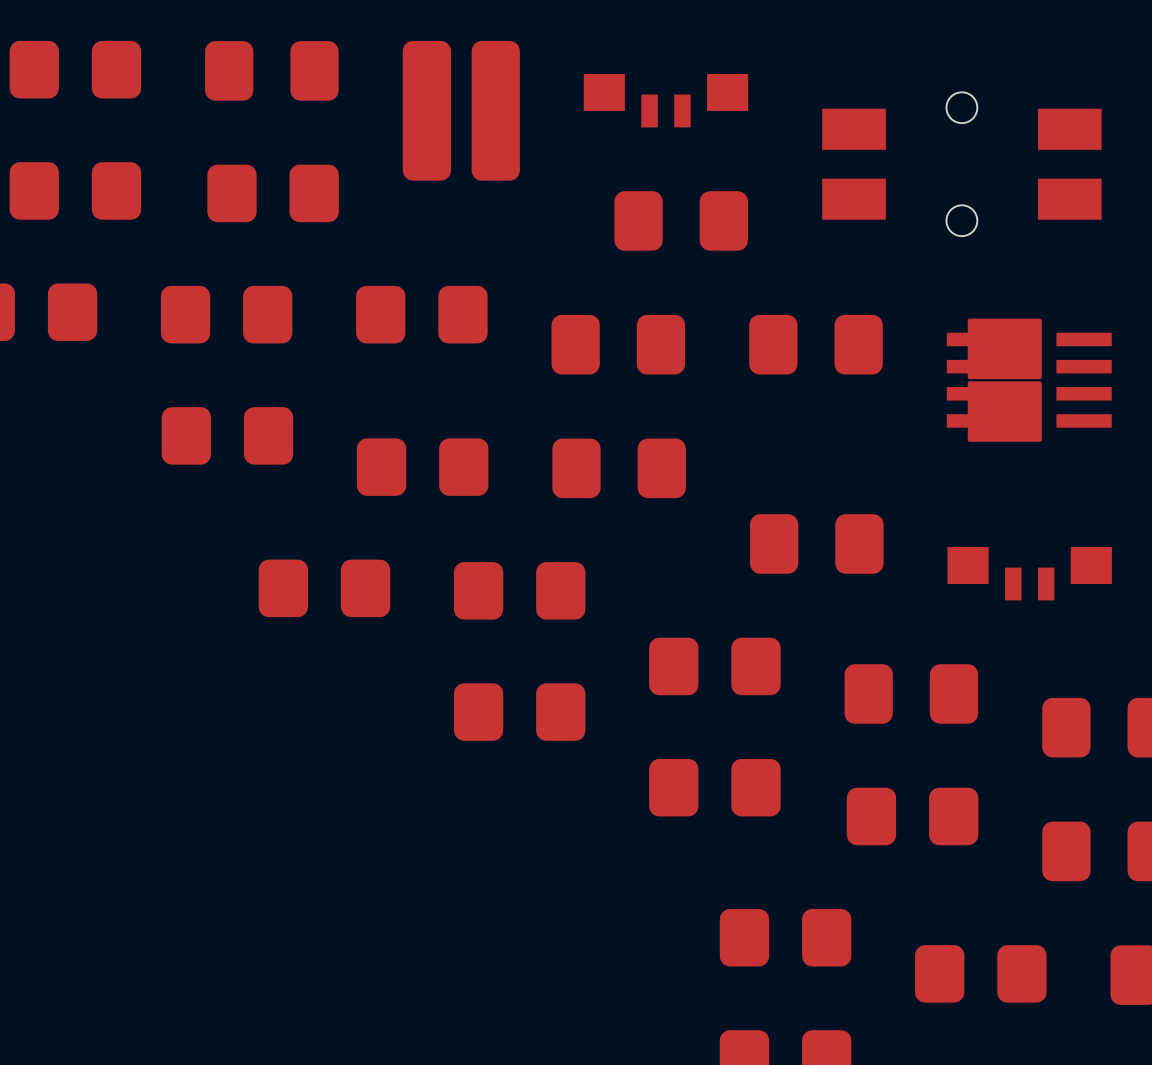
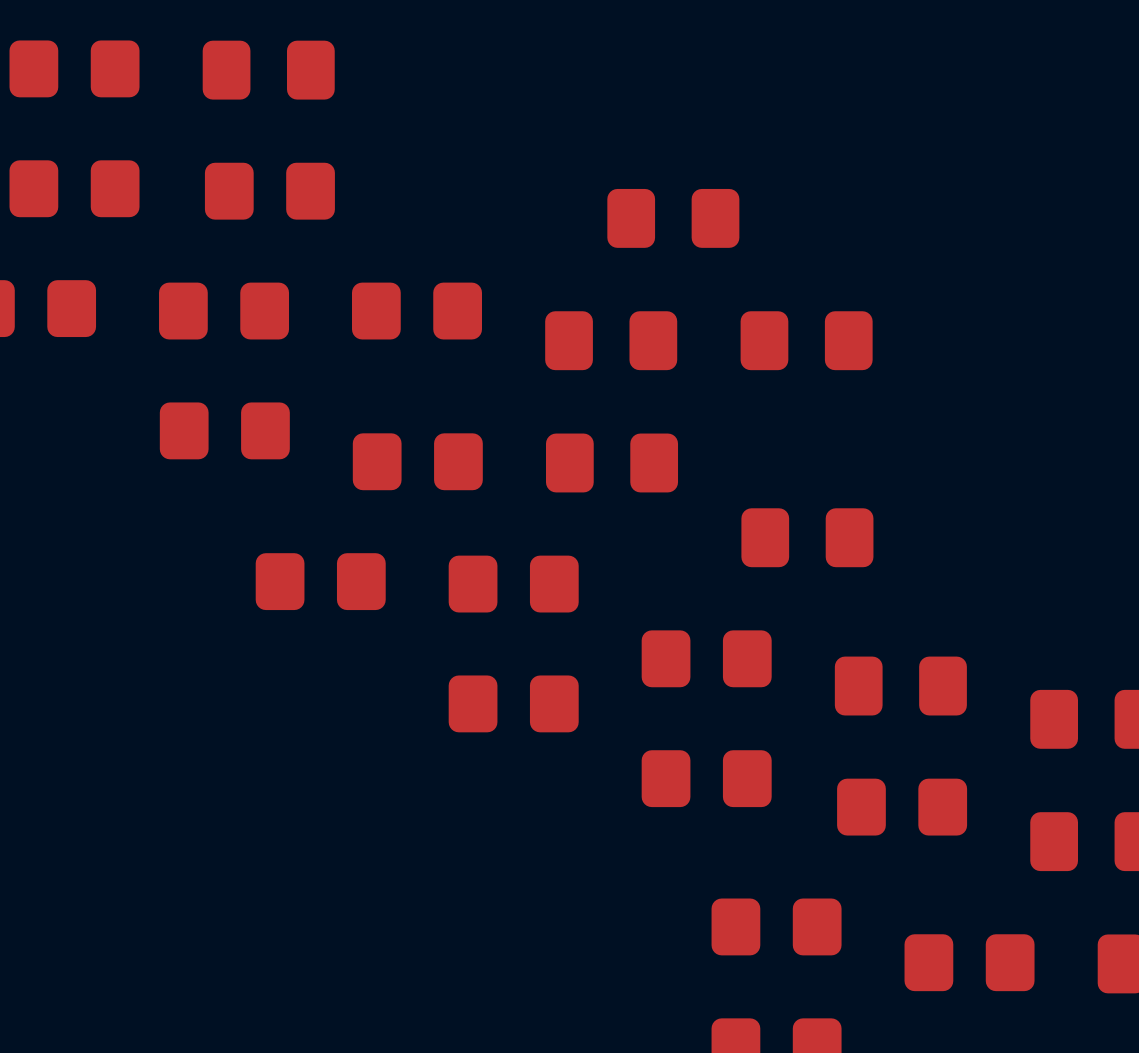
part: (665, 100) -> none
part: (461, 110) -> none
part: (961, 164) -> none
part: (1029, 380) -> none
part: (1029, 573) -> none

